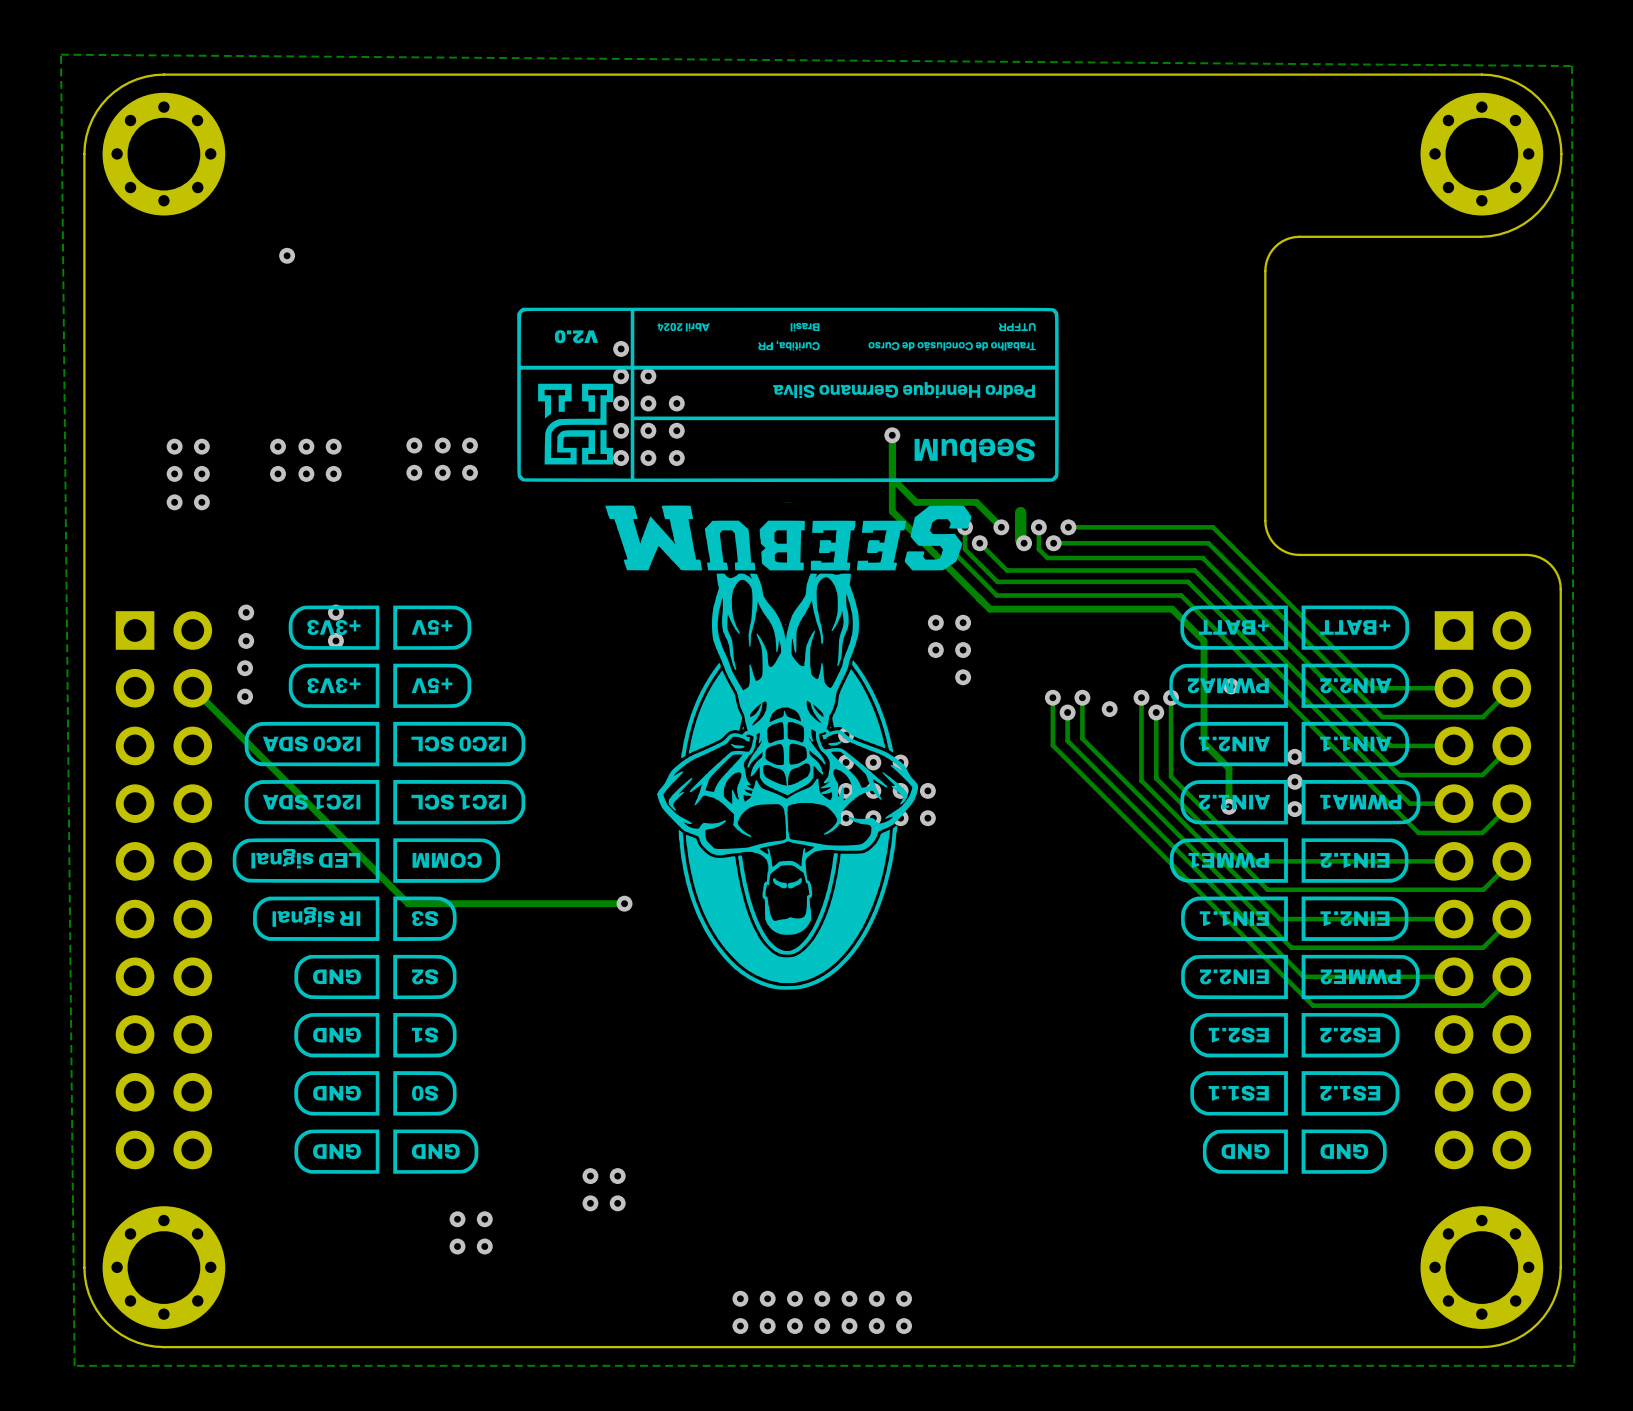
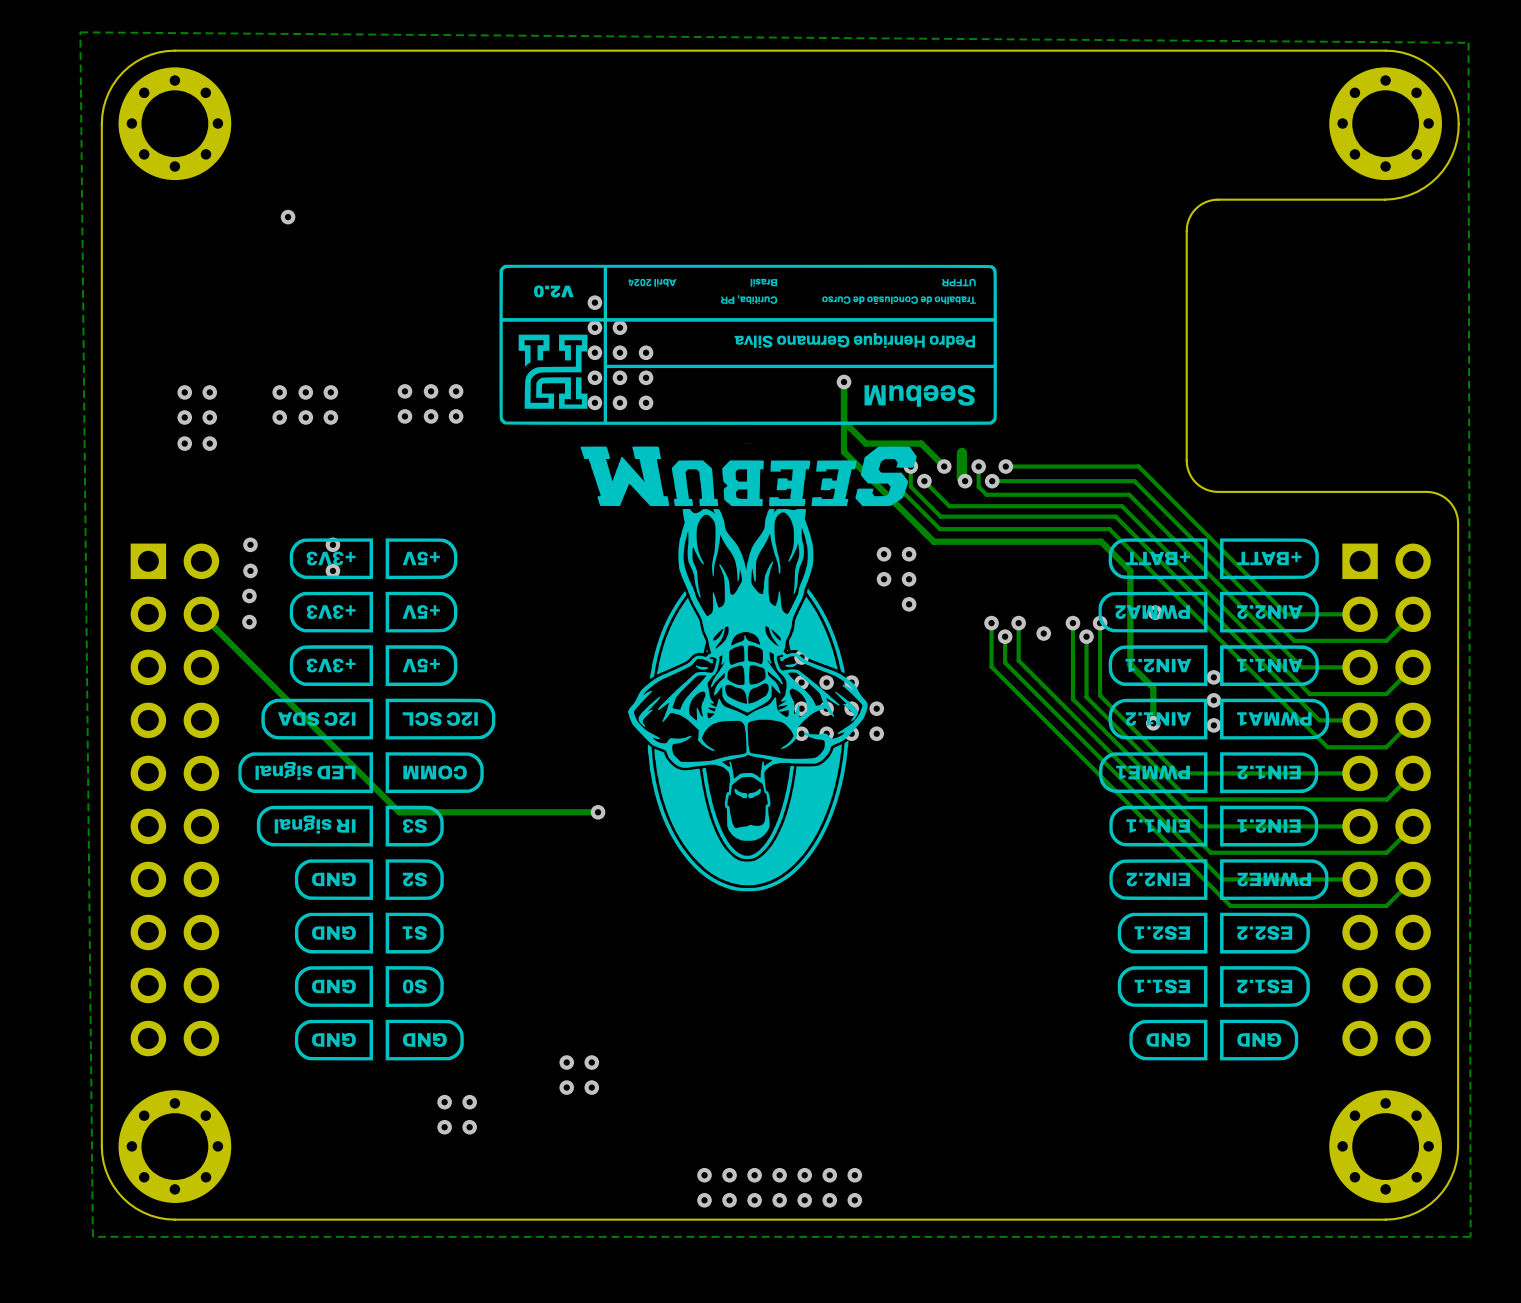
drawing shape: [232, 605, 526, 1174] -> [238, 538, 496, 1061]

